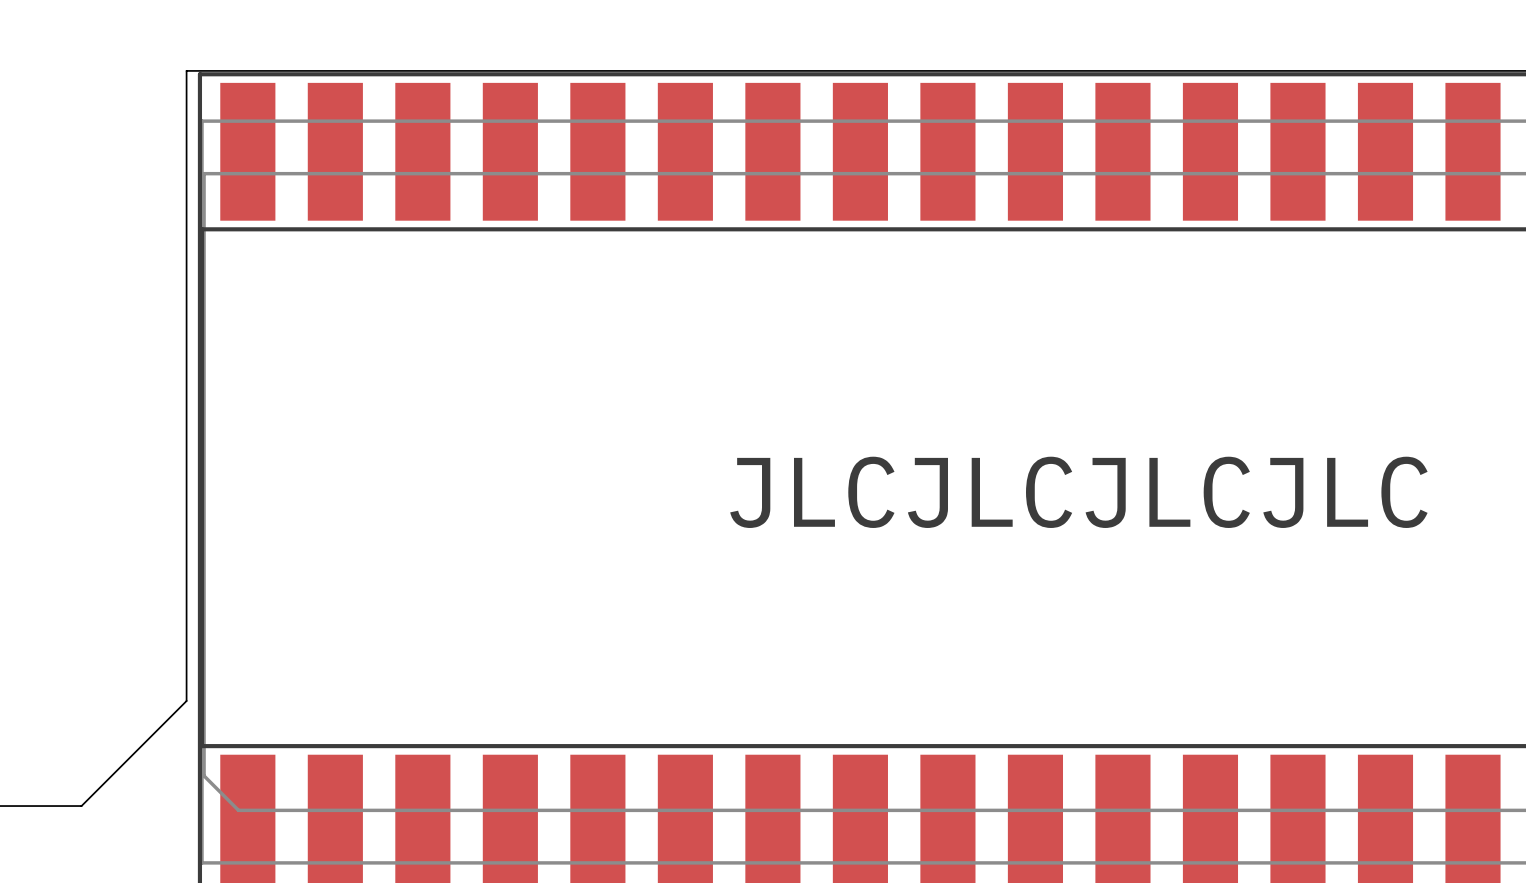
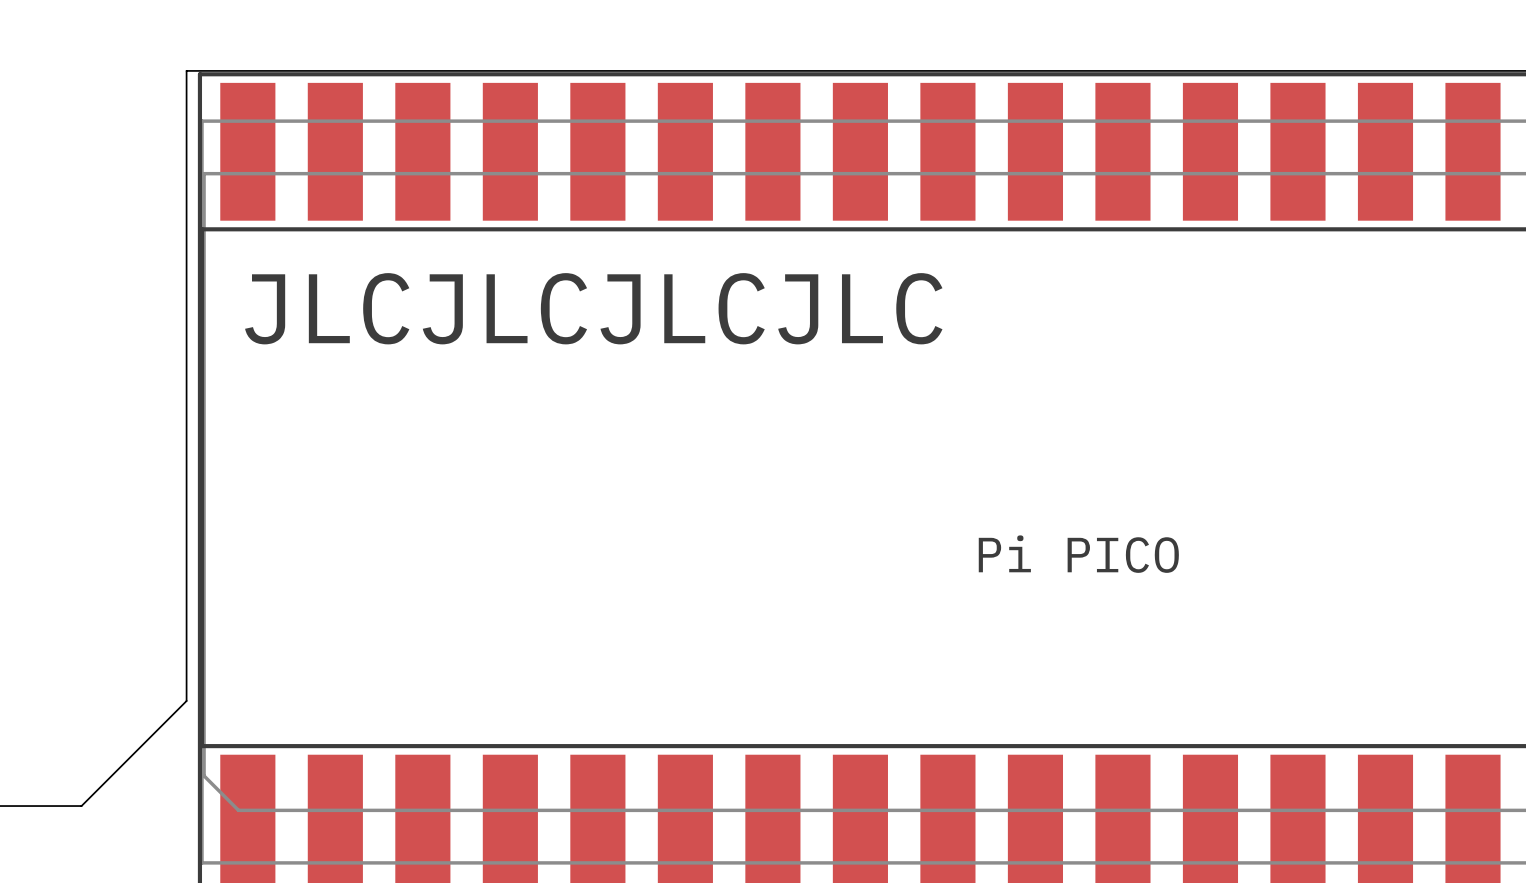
text position: JLCJLCJLCJLC (1078, 492) -> JLCJLCJLCJLC (593, 308)
part value: none -> Pi PICO (1078, 554)

